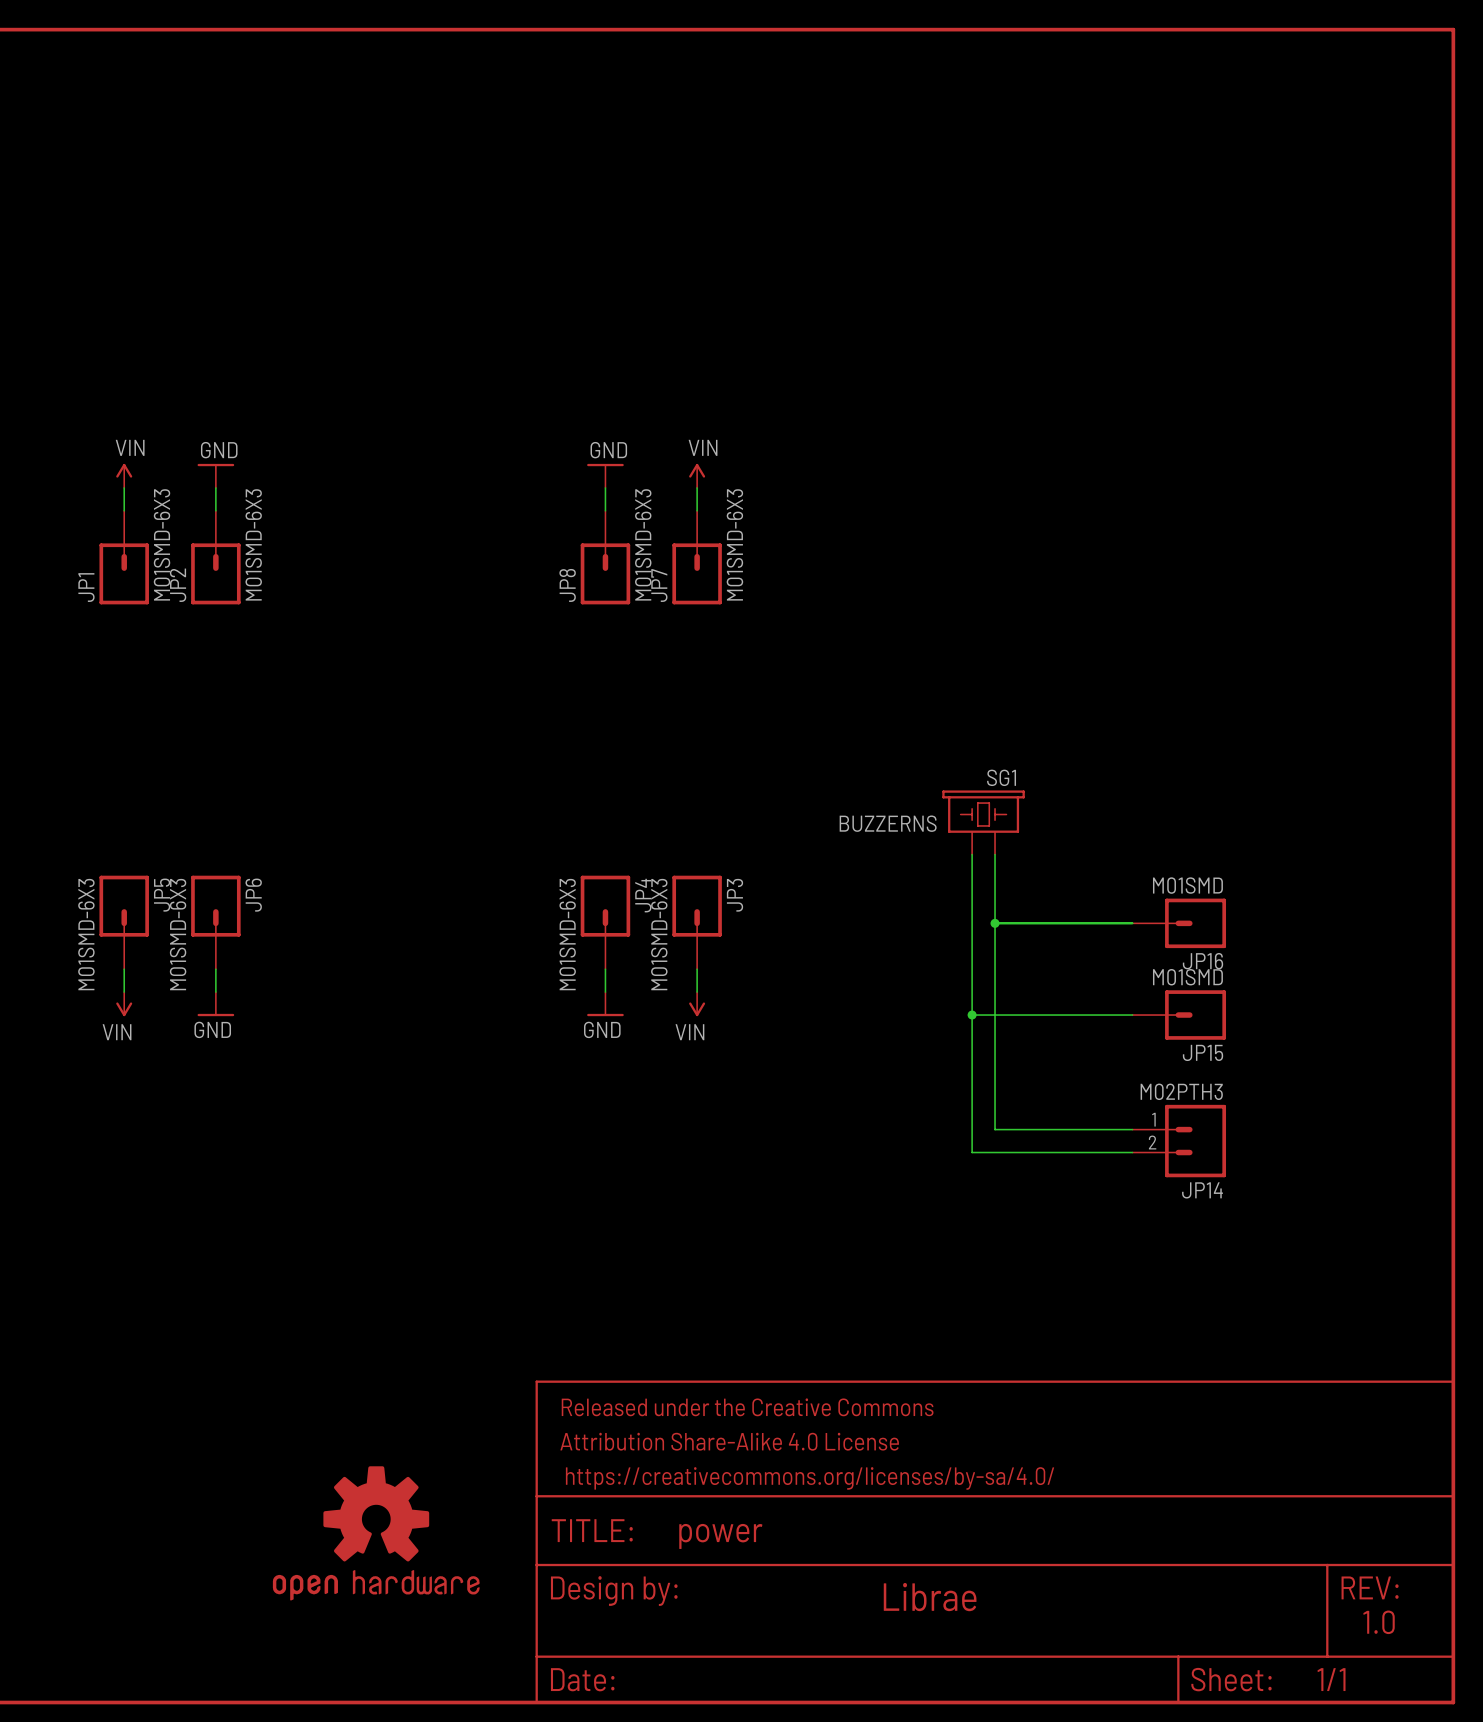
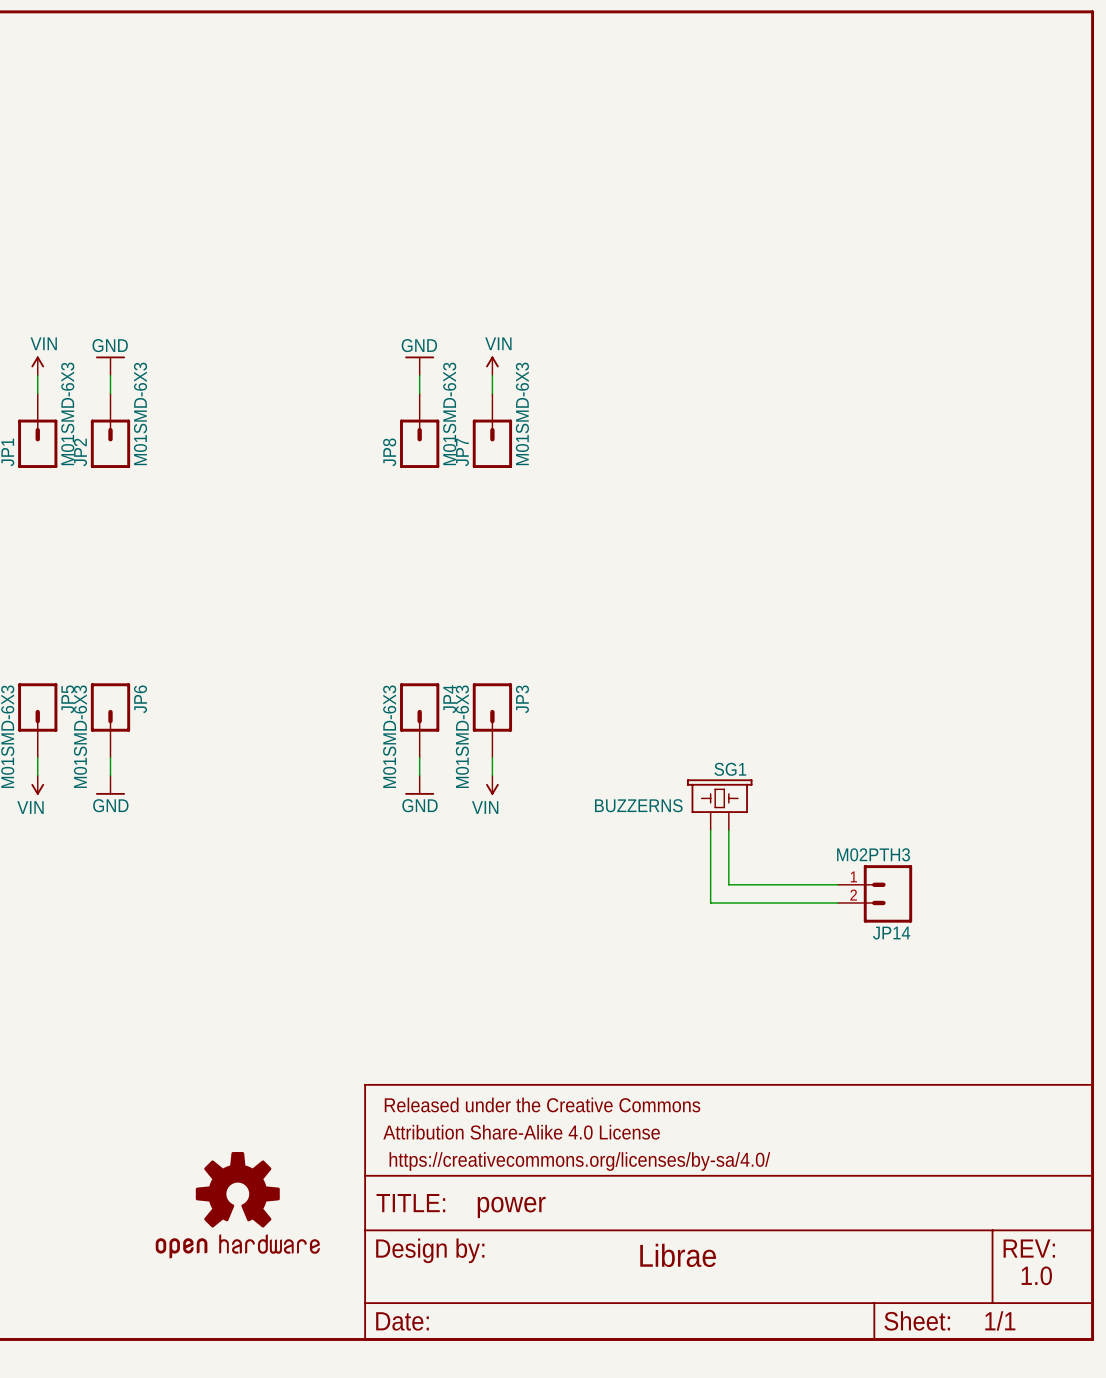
SG1 position: (983, 822) -> (719, 804)
wire: (972, 854) (972, 1060) -> none
wire: (995, 854) (995, 1060) -> none
wire: (995, 923) (1132, 923) -> none
junction: (995, 923) -> none
JP16: M01SMD (1179, 923) -> none
wire: (972, 1015) (1132, 1015) -> none
junction: (972, 1015) -> none
JP15: M01SMD (1179, 1015) -> none

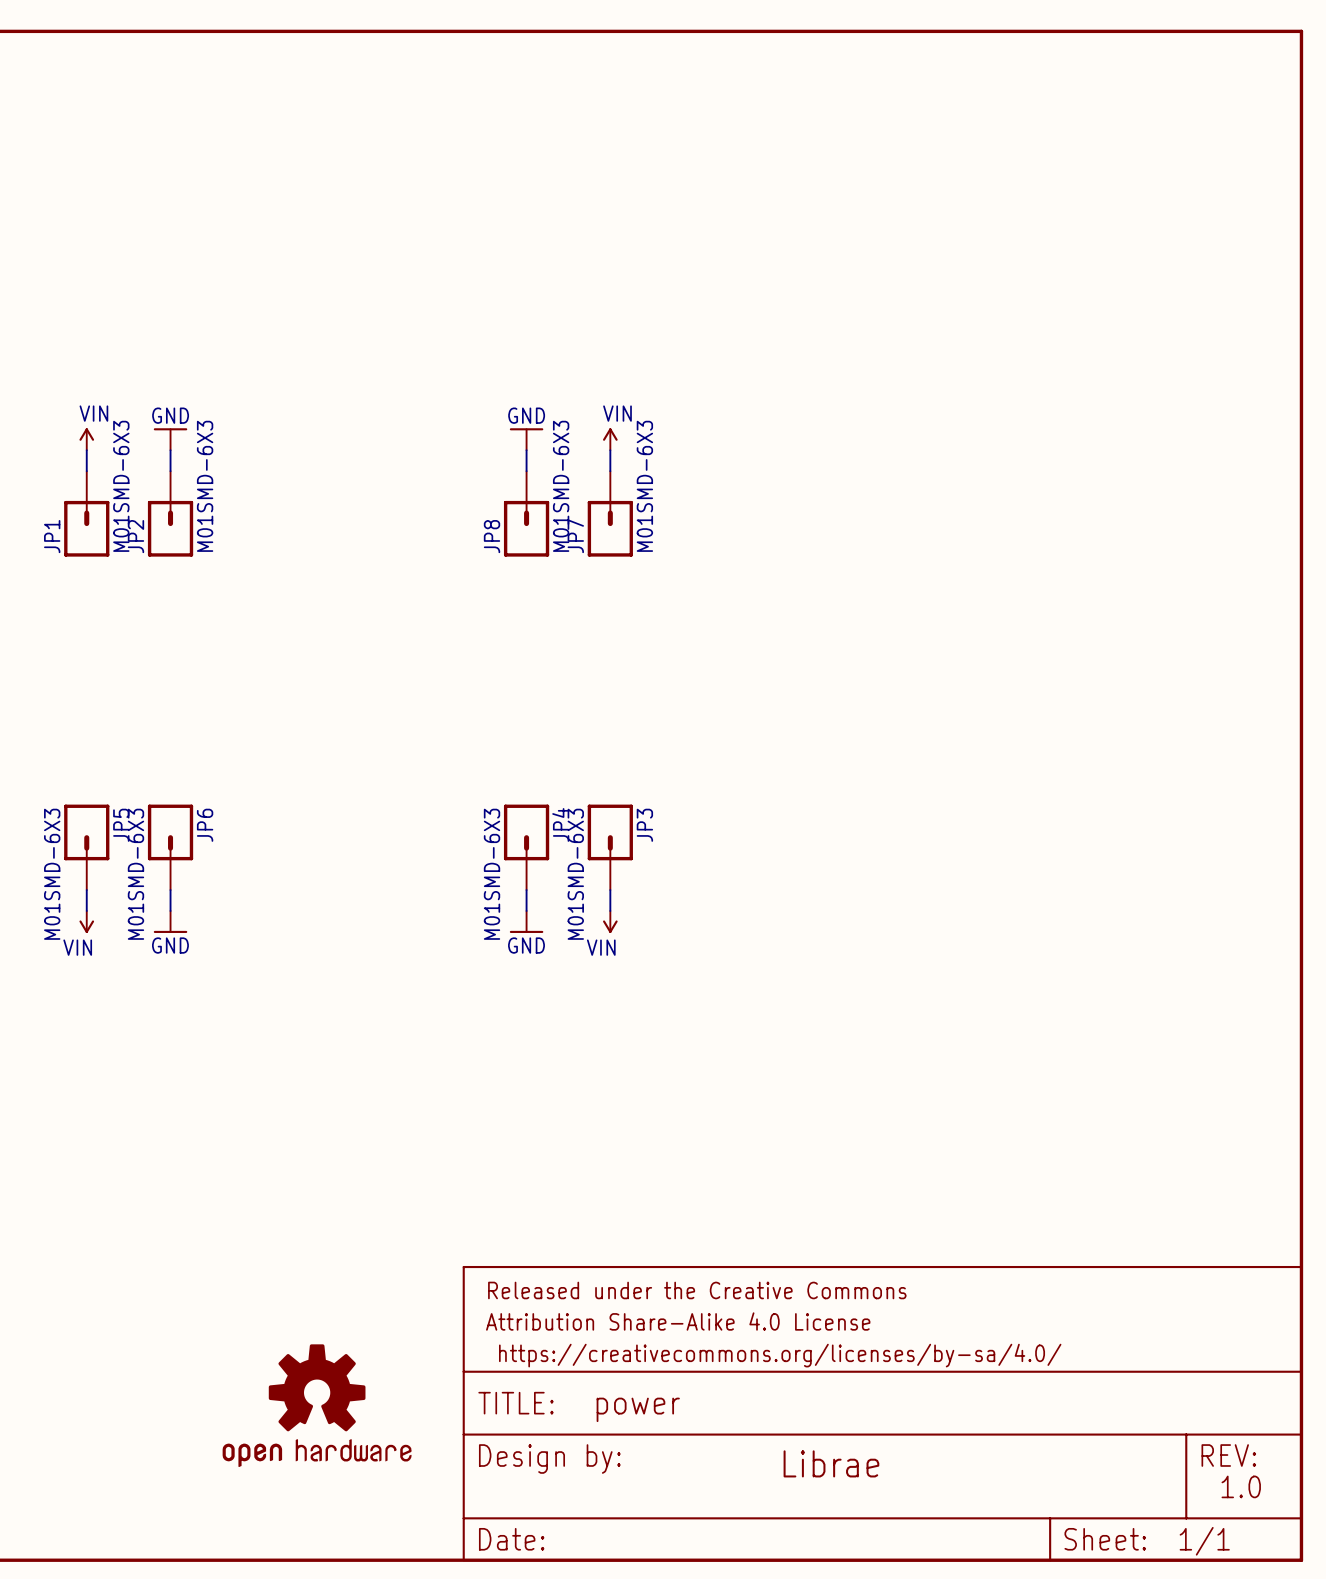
SG1: BUZZERNS (719, 804) -> none
wire: (710, 830) (710, 903) (837, 903) -> none
wire: (728, 830) (728, 884) (837, 884) -> none
JP14: M02PTH3 (875, 893) -> none

